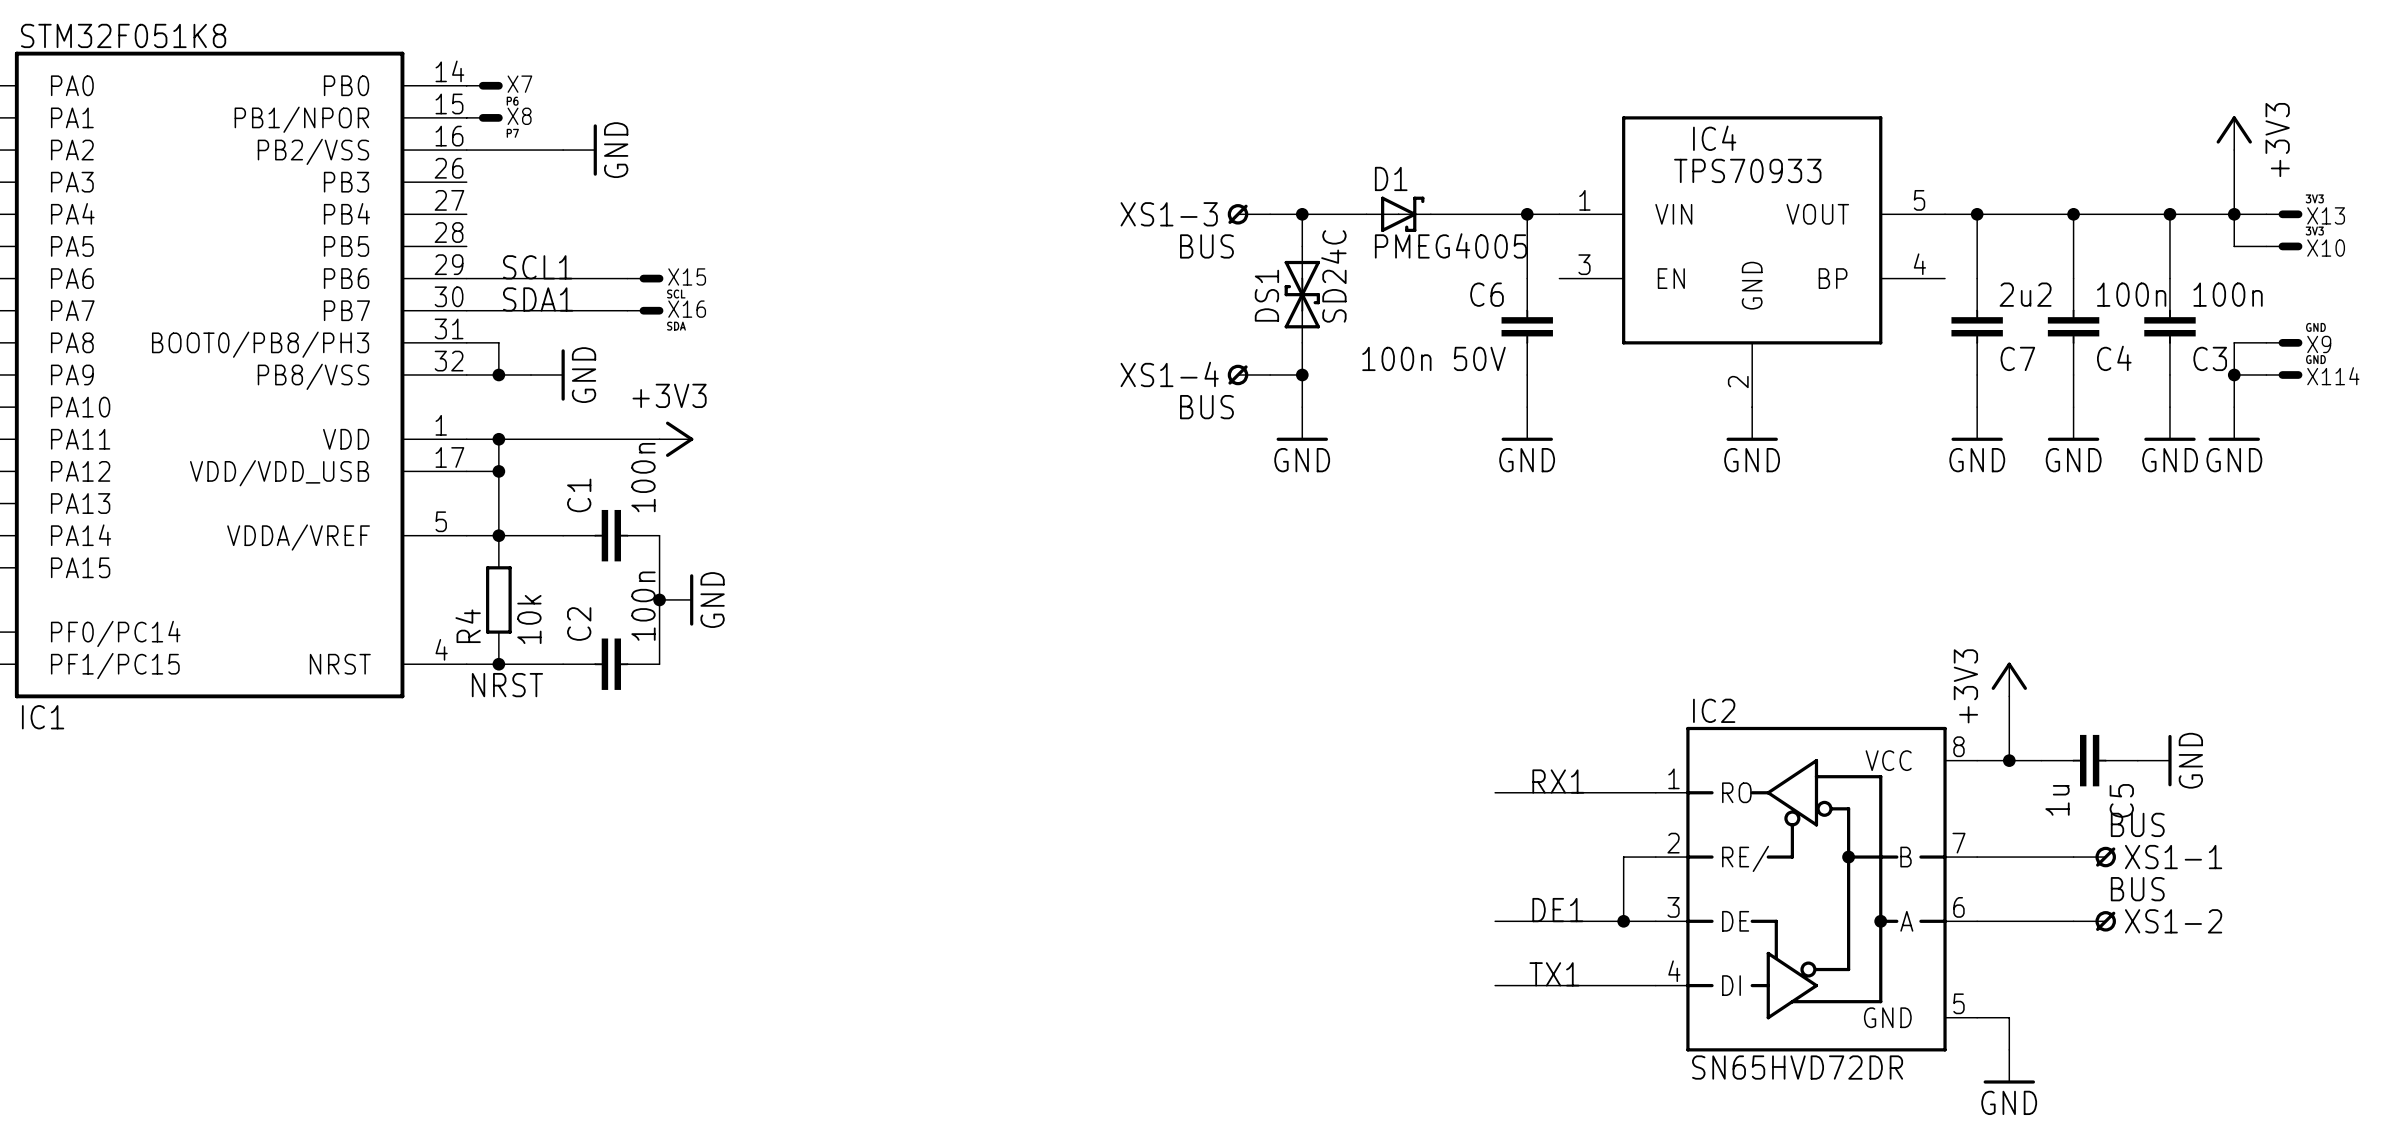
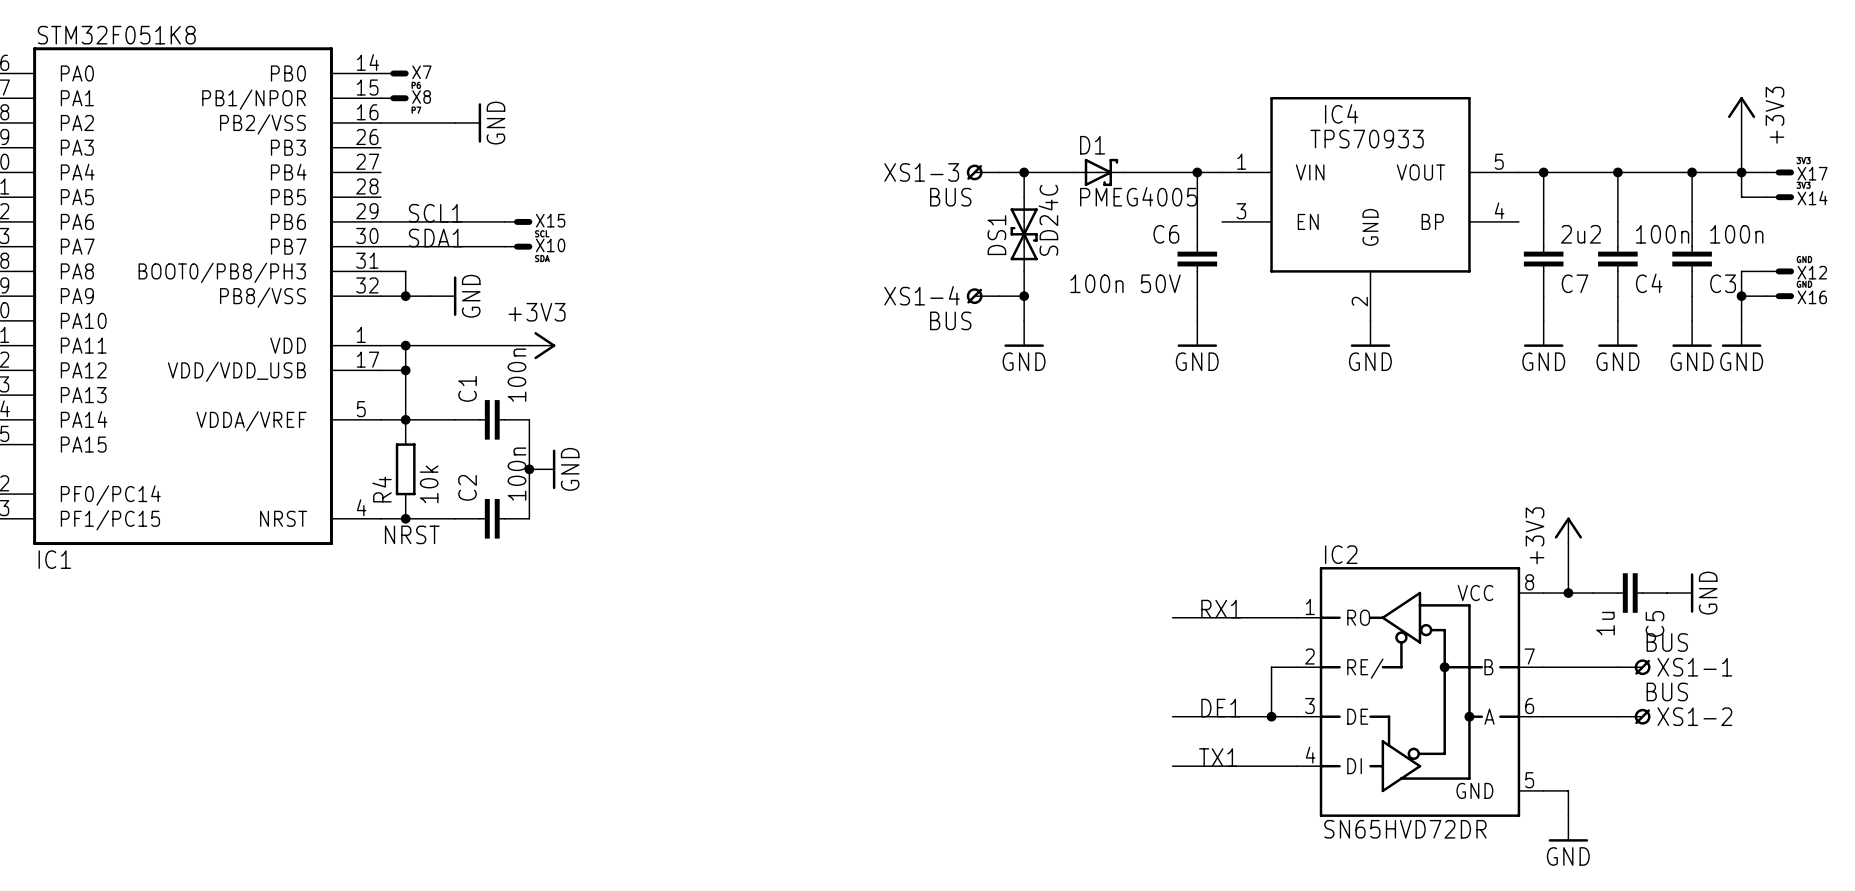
X13 name: X13 (2326, 215) -> X17 (1812, 173)
X10 name: X10 (2326, 248) -> X14 (1812, 198)
X16 name: X16 (687, 309) -> X10 (550, 245)
X9 name: X9 (2319, 344) -> X12 (1812, 272)
X114 name: X114 (2333, 376) -> X16 (1812, 297)

